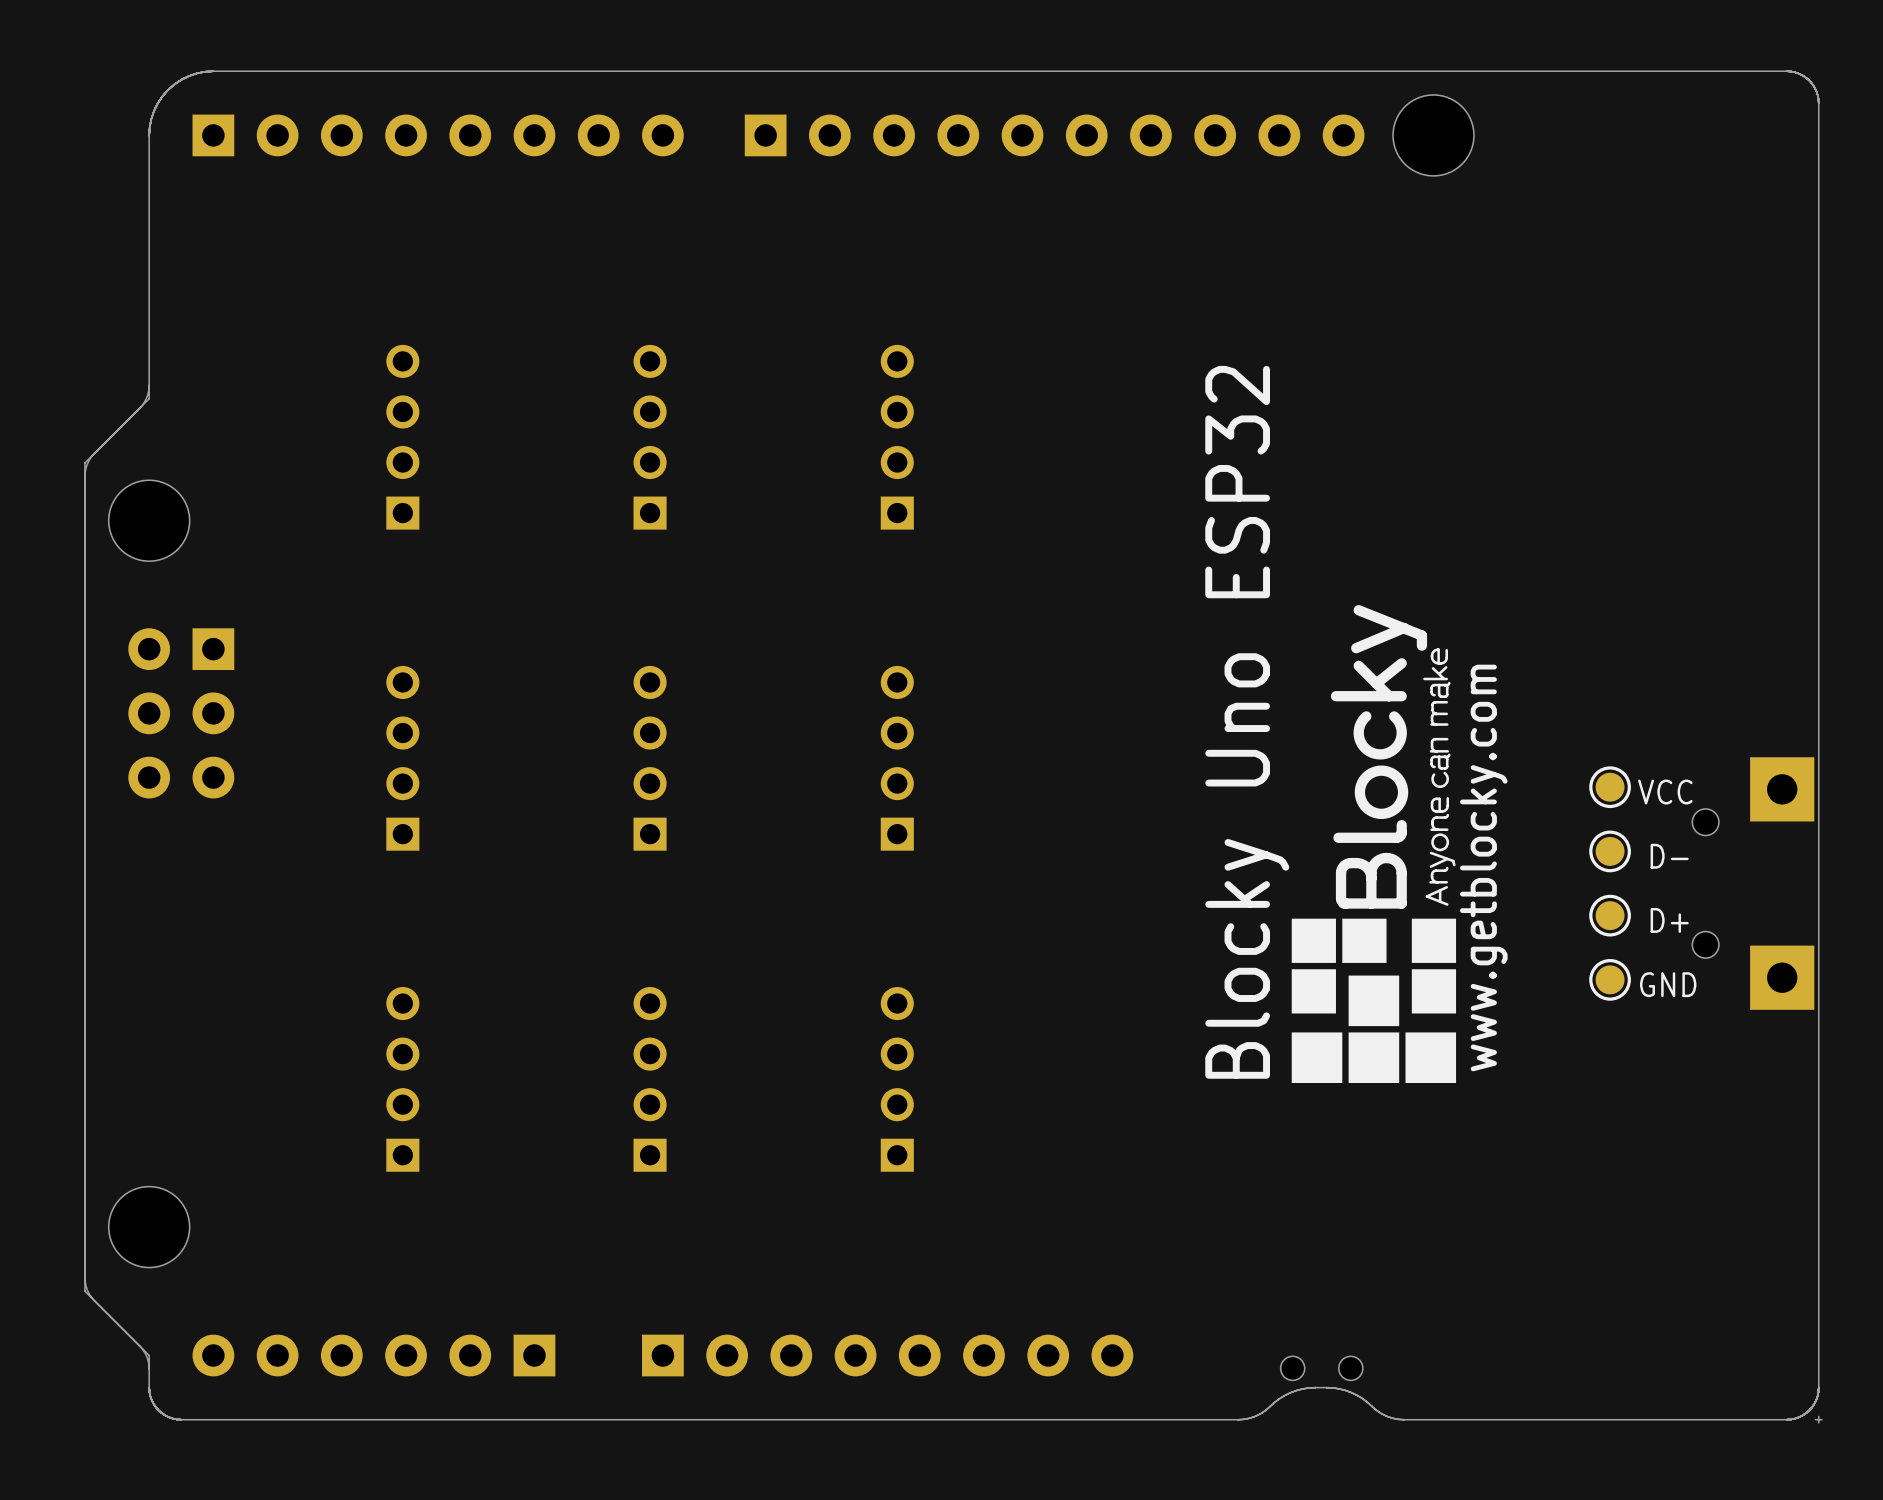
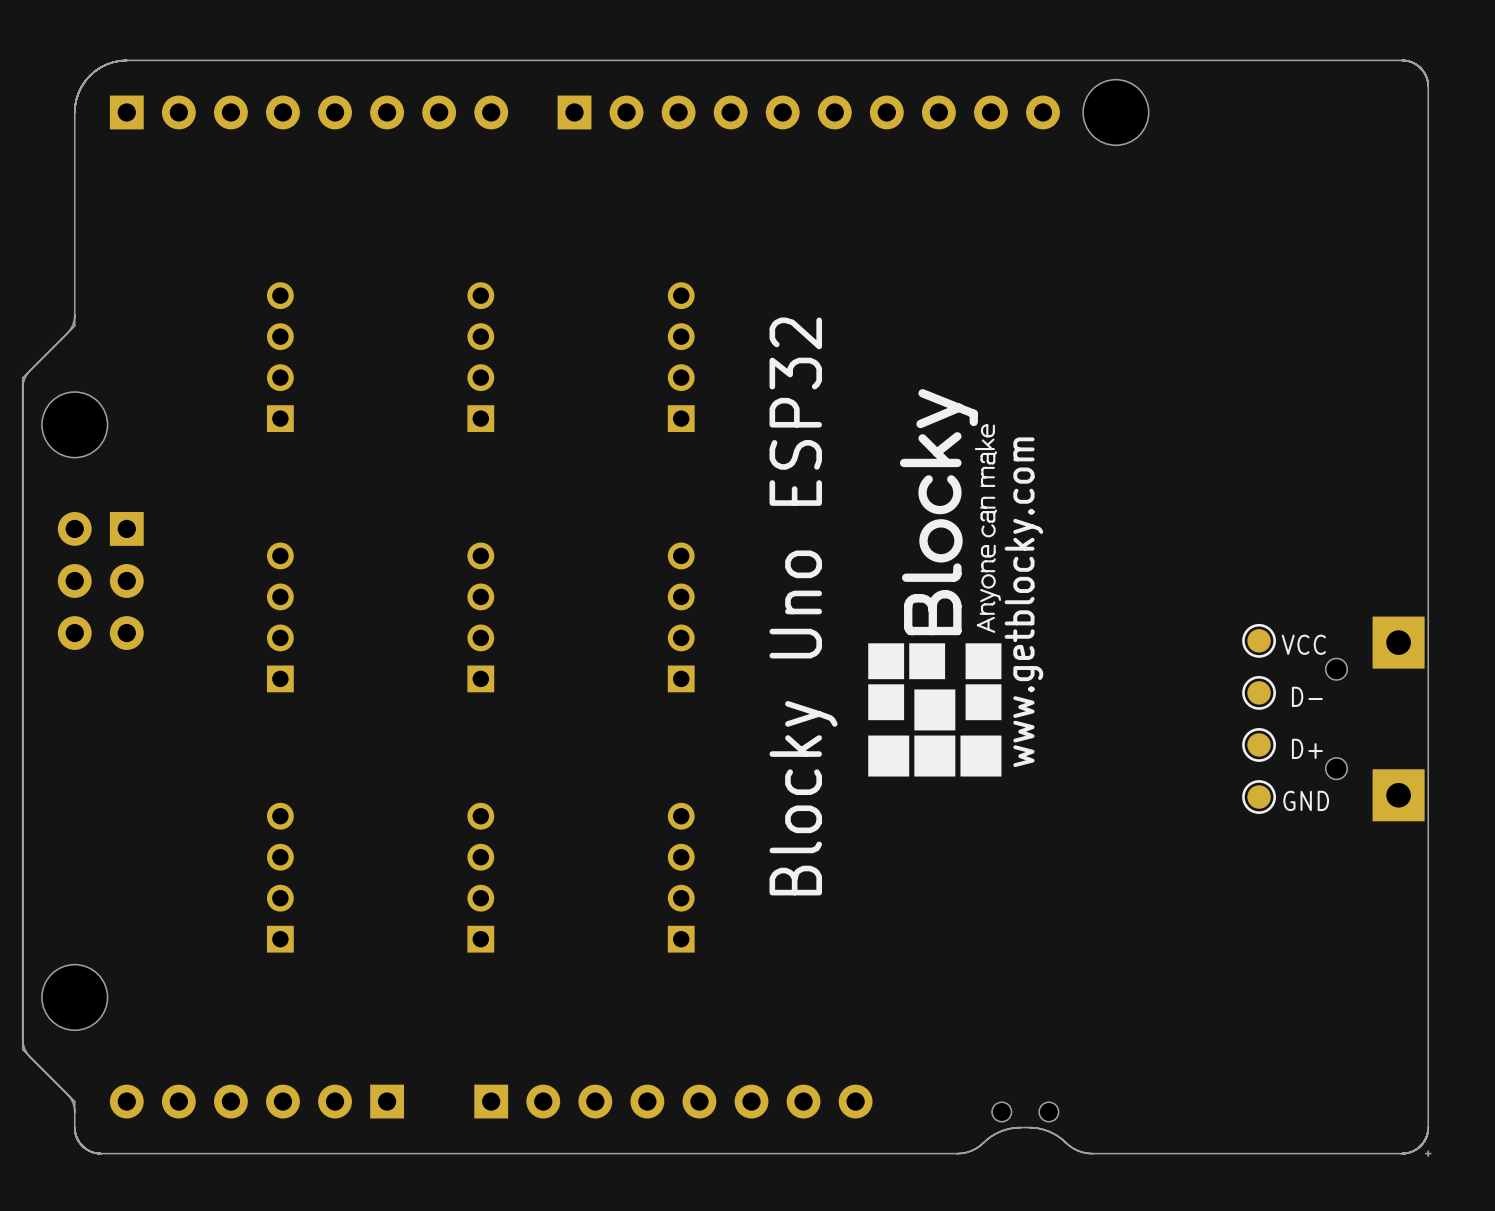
text position: Blocky Uno ESP32 (1247, 722) -> Blocky Uno ESP32 (803, 606)
drawing position: (1373, 844) -> (934, 582)

